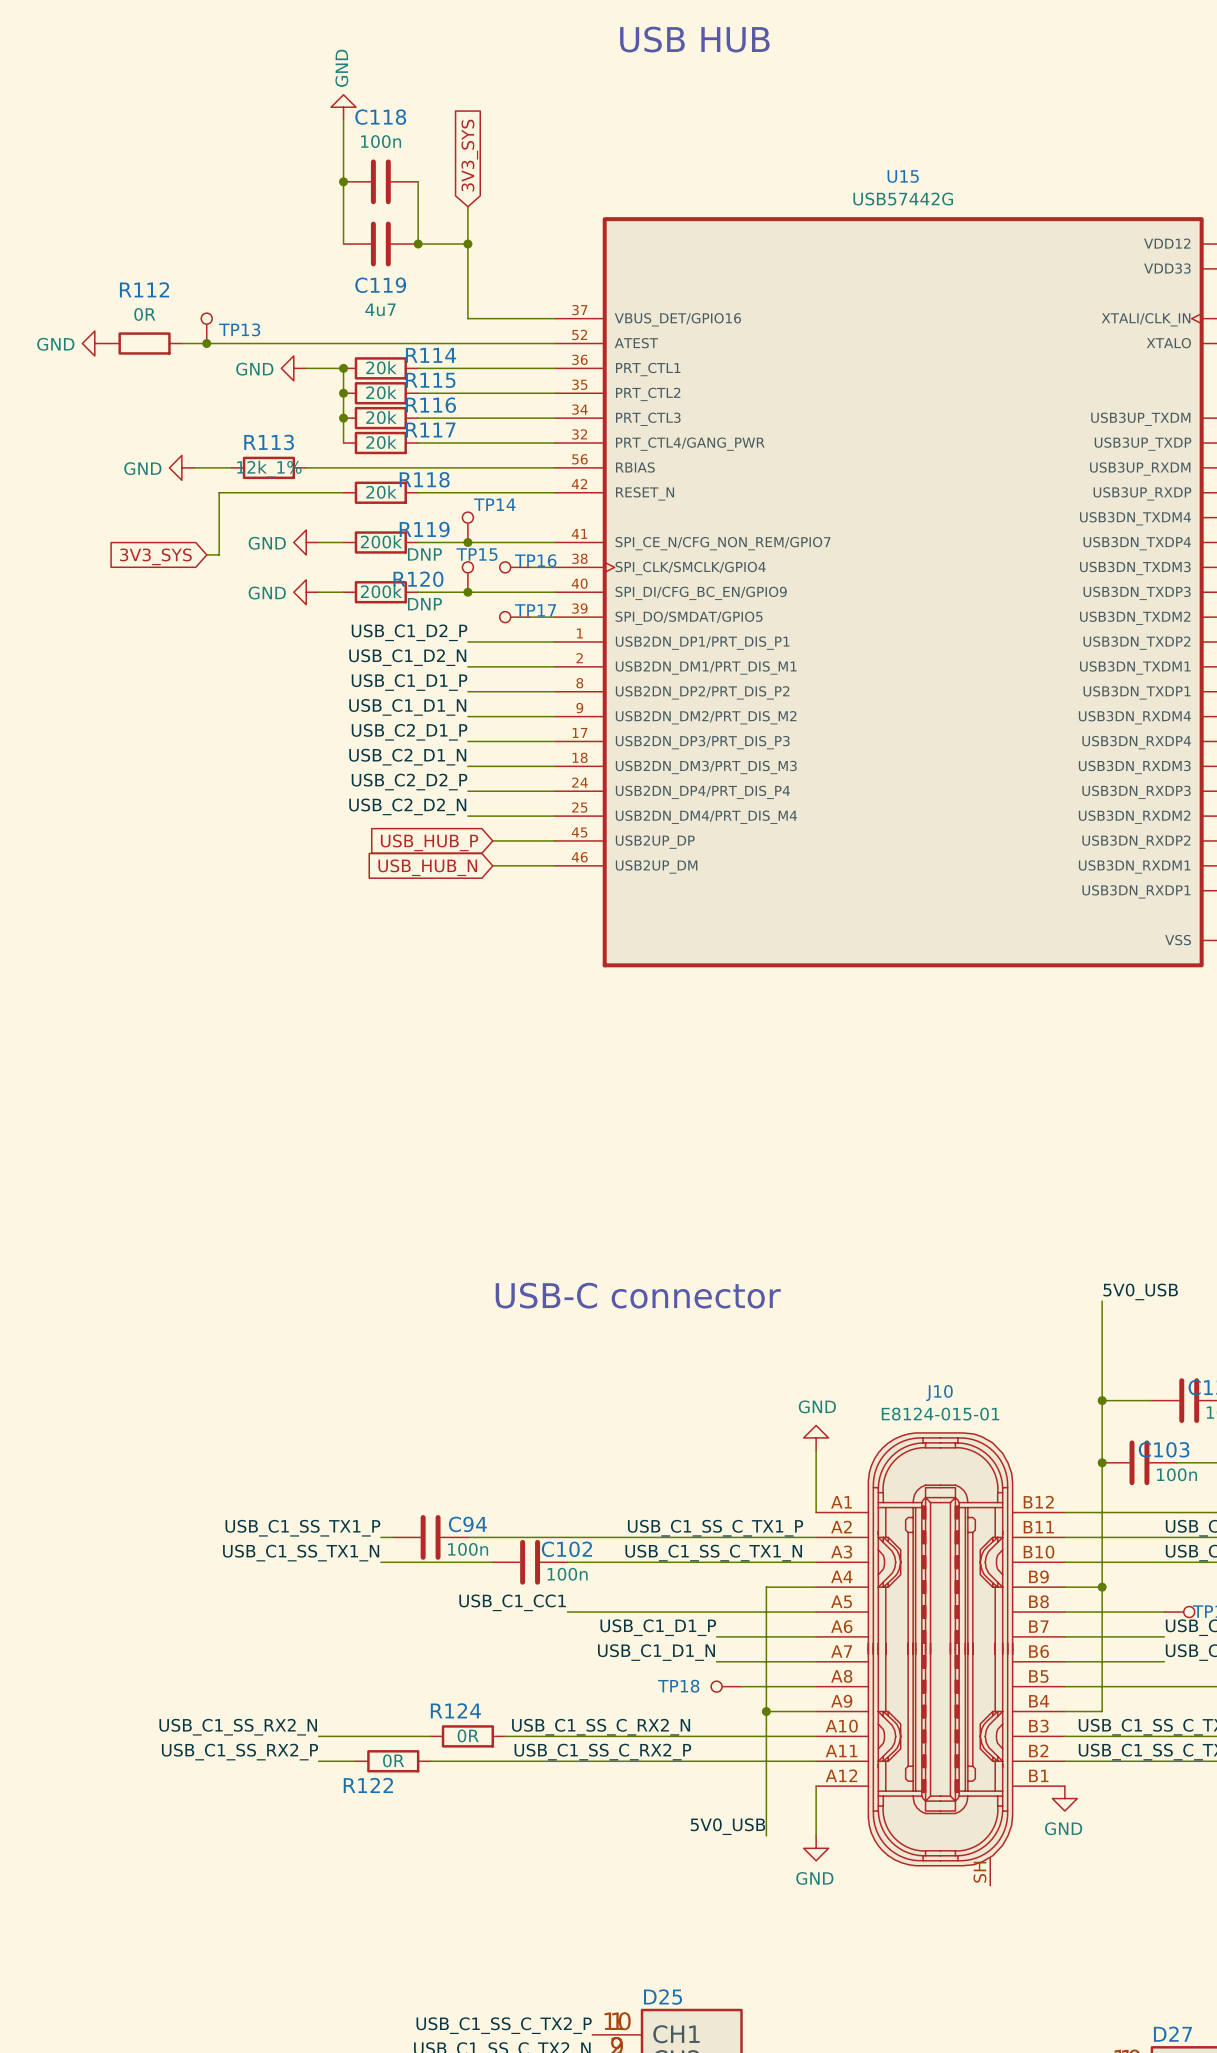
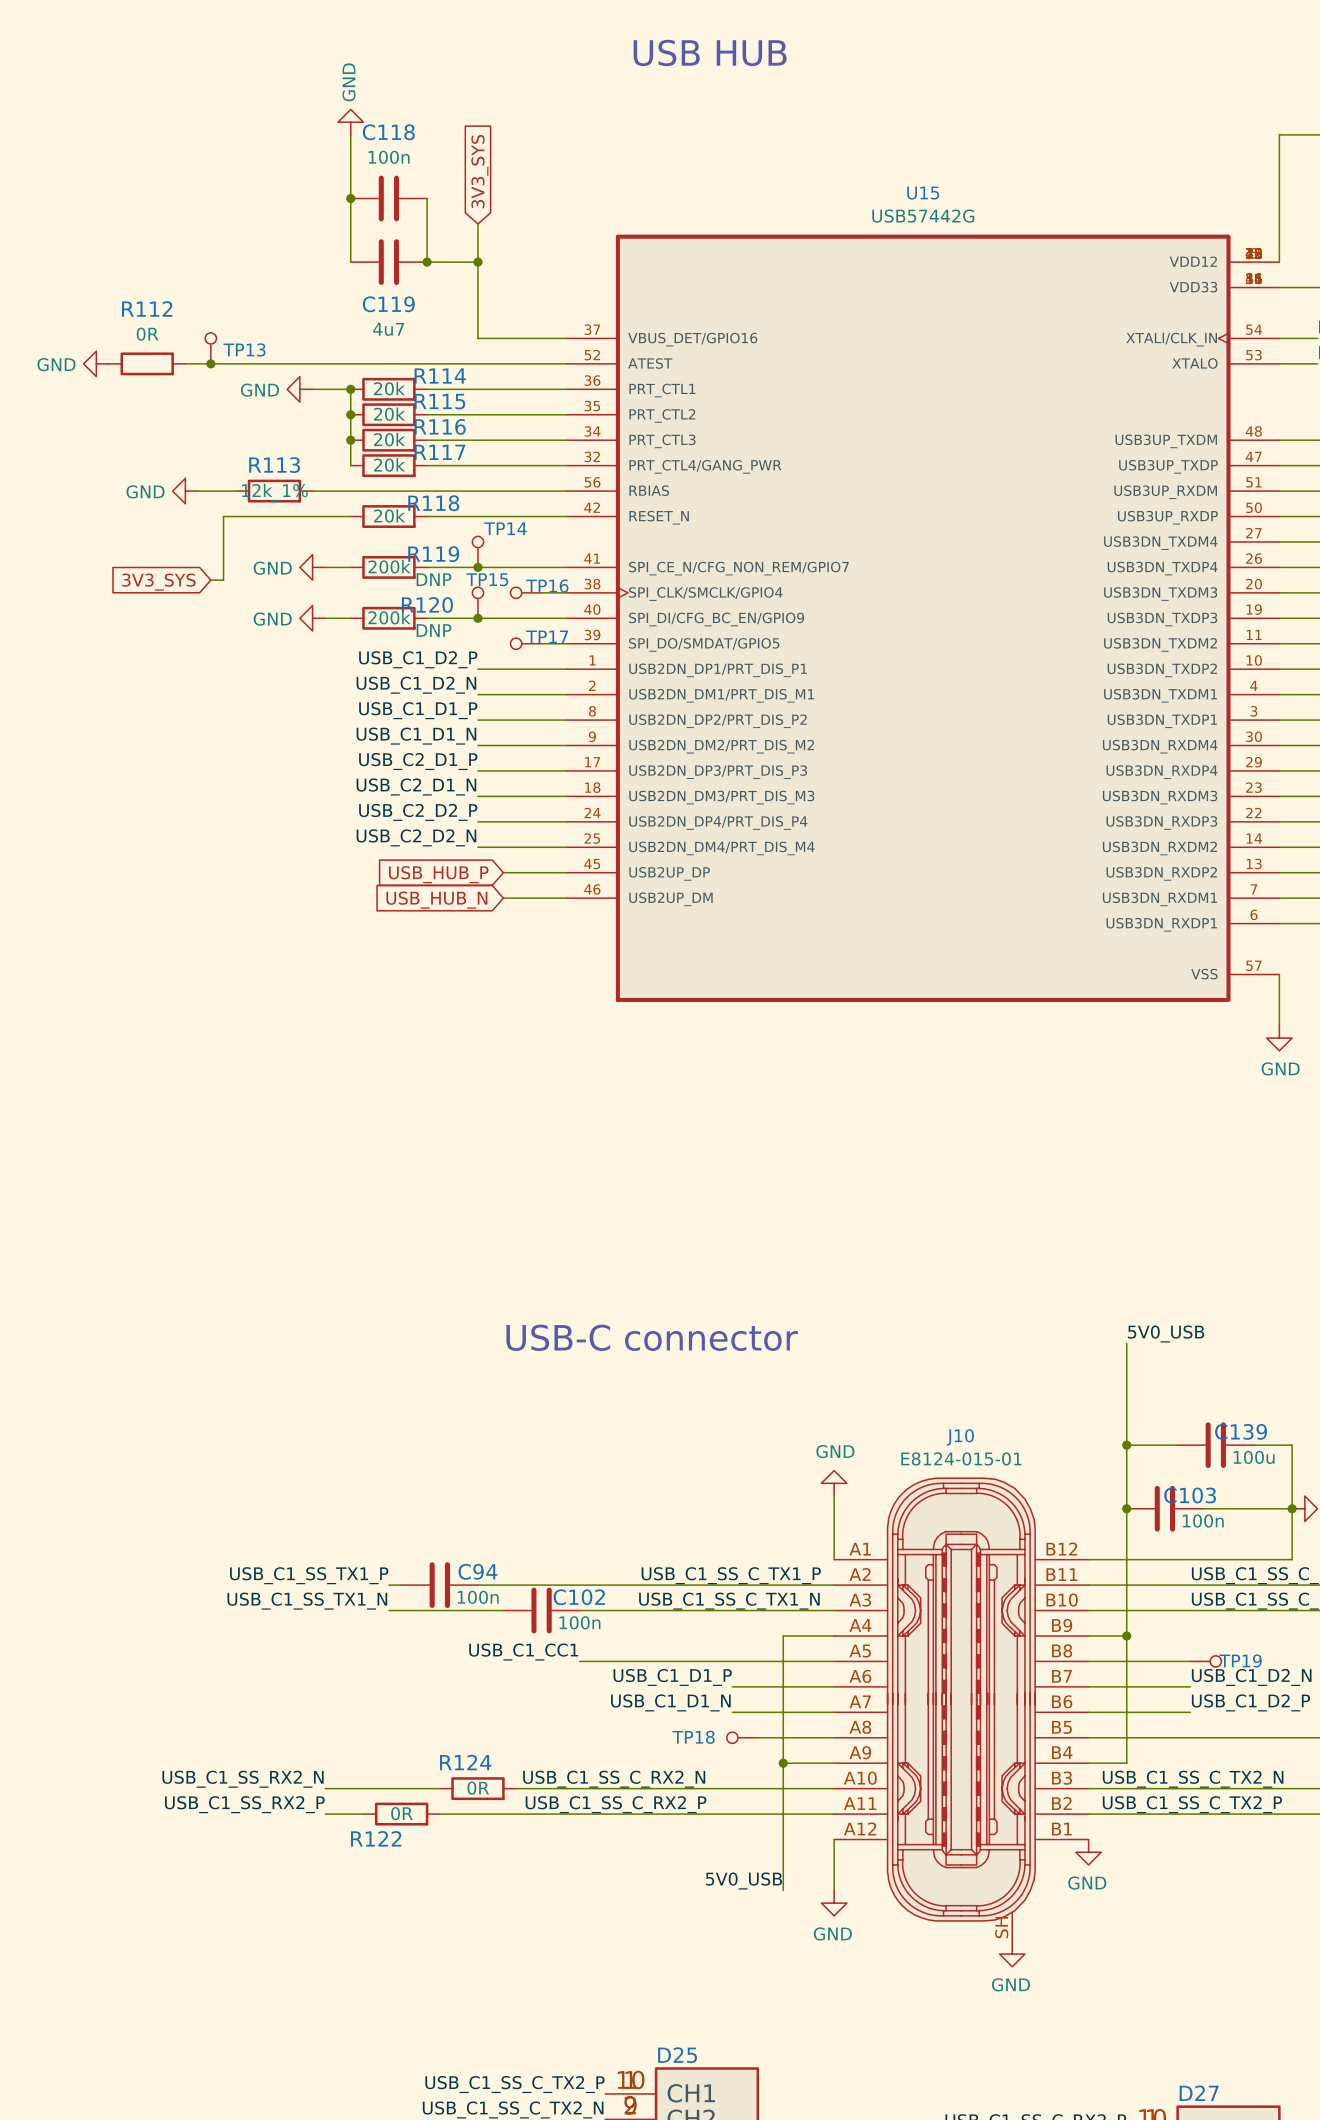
power symbol: none -> GND (1012, 1954)

